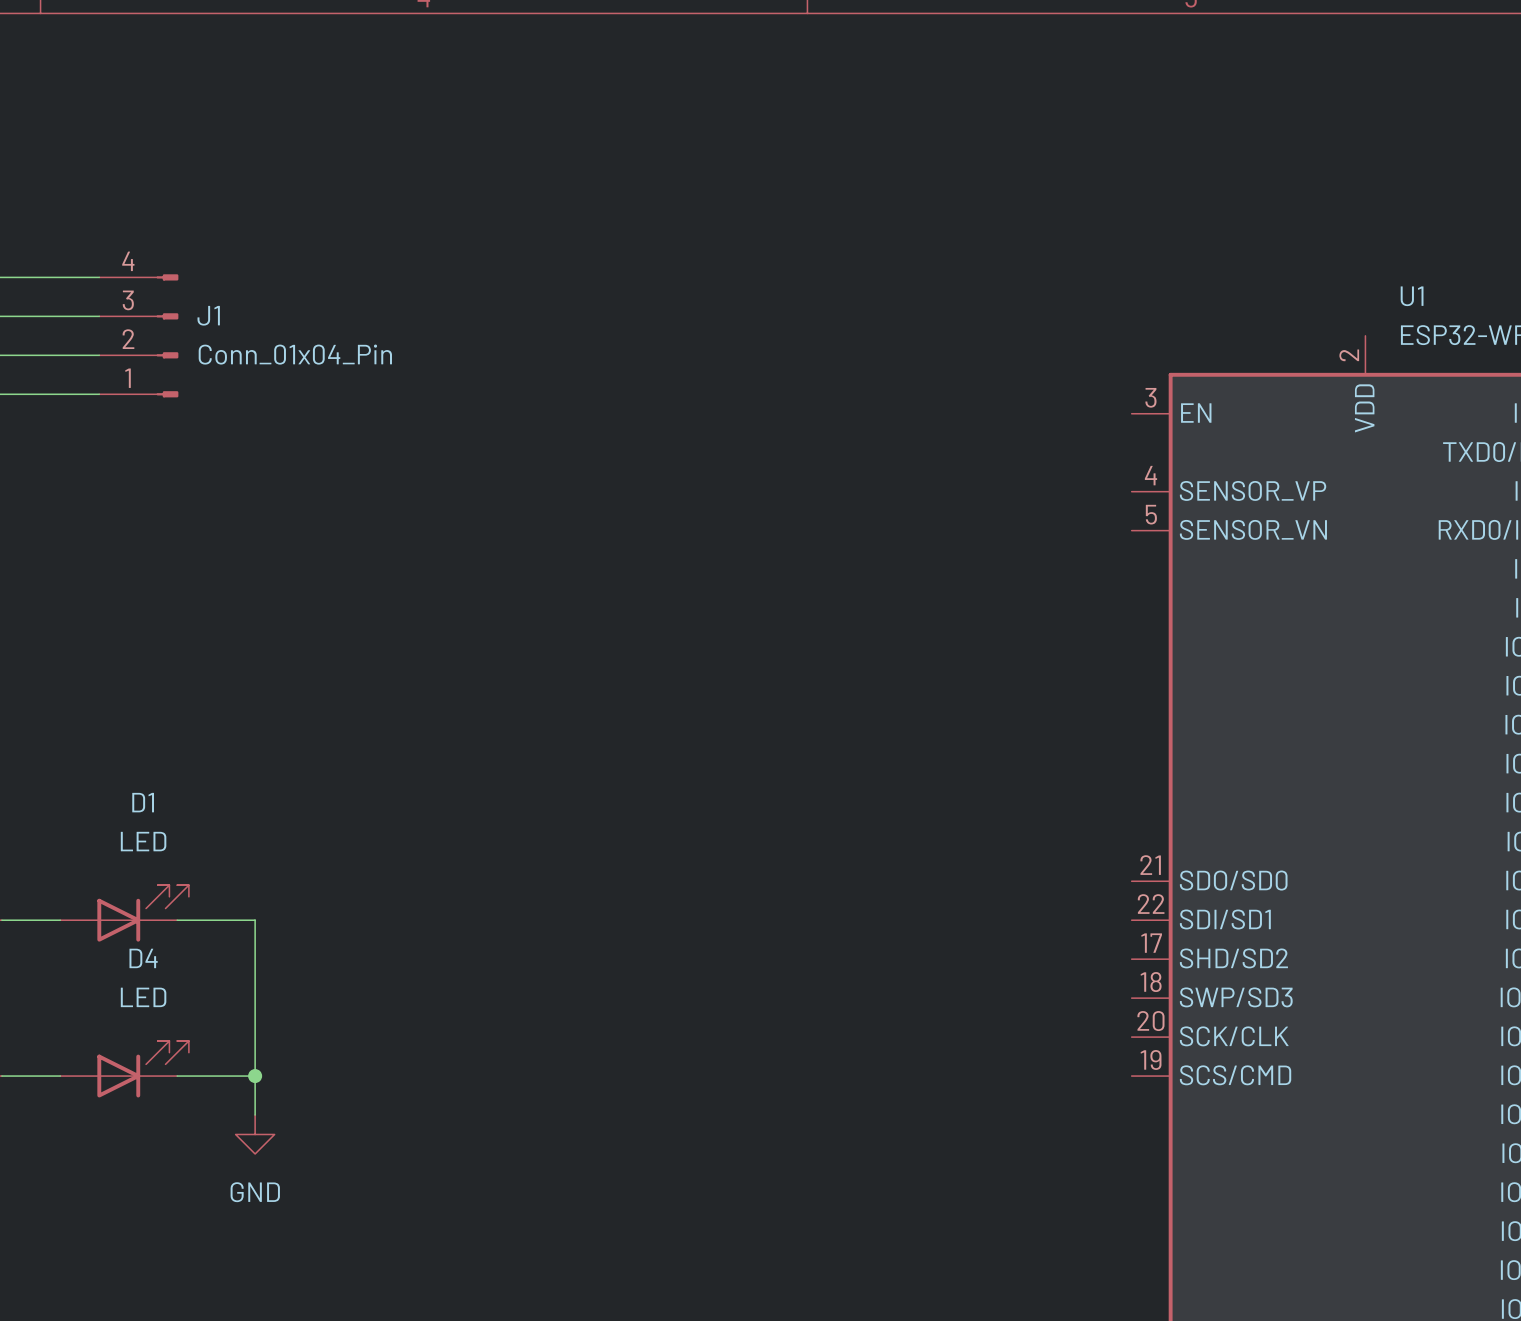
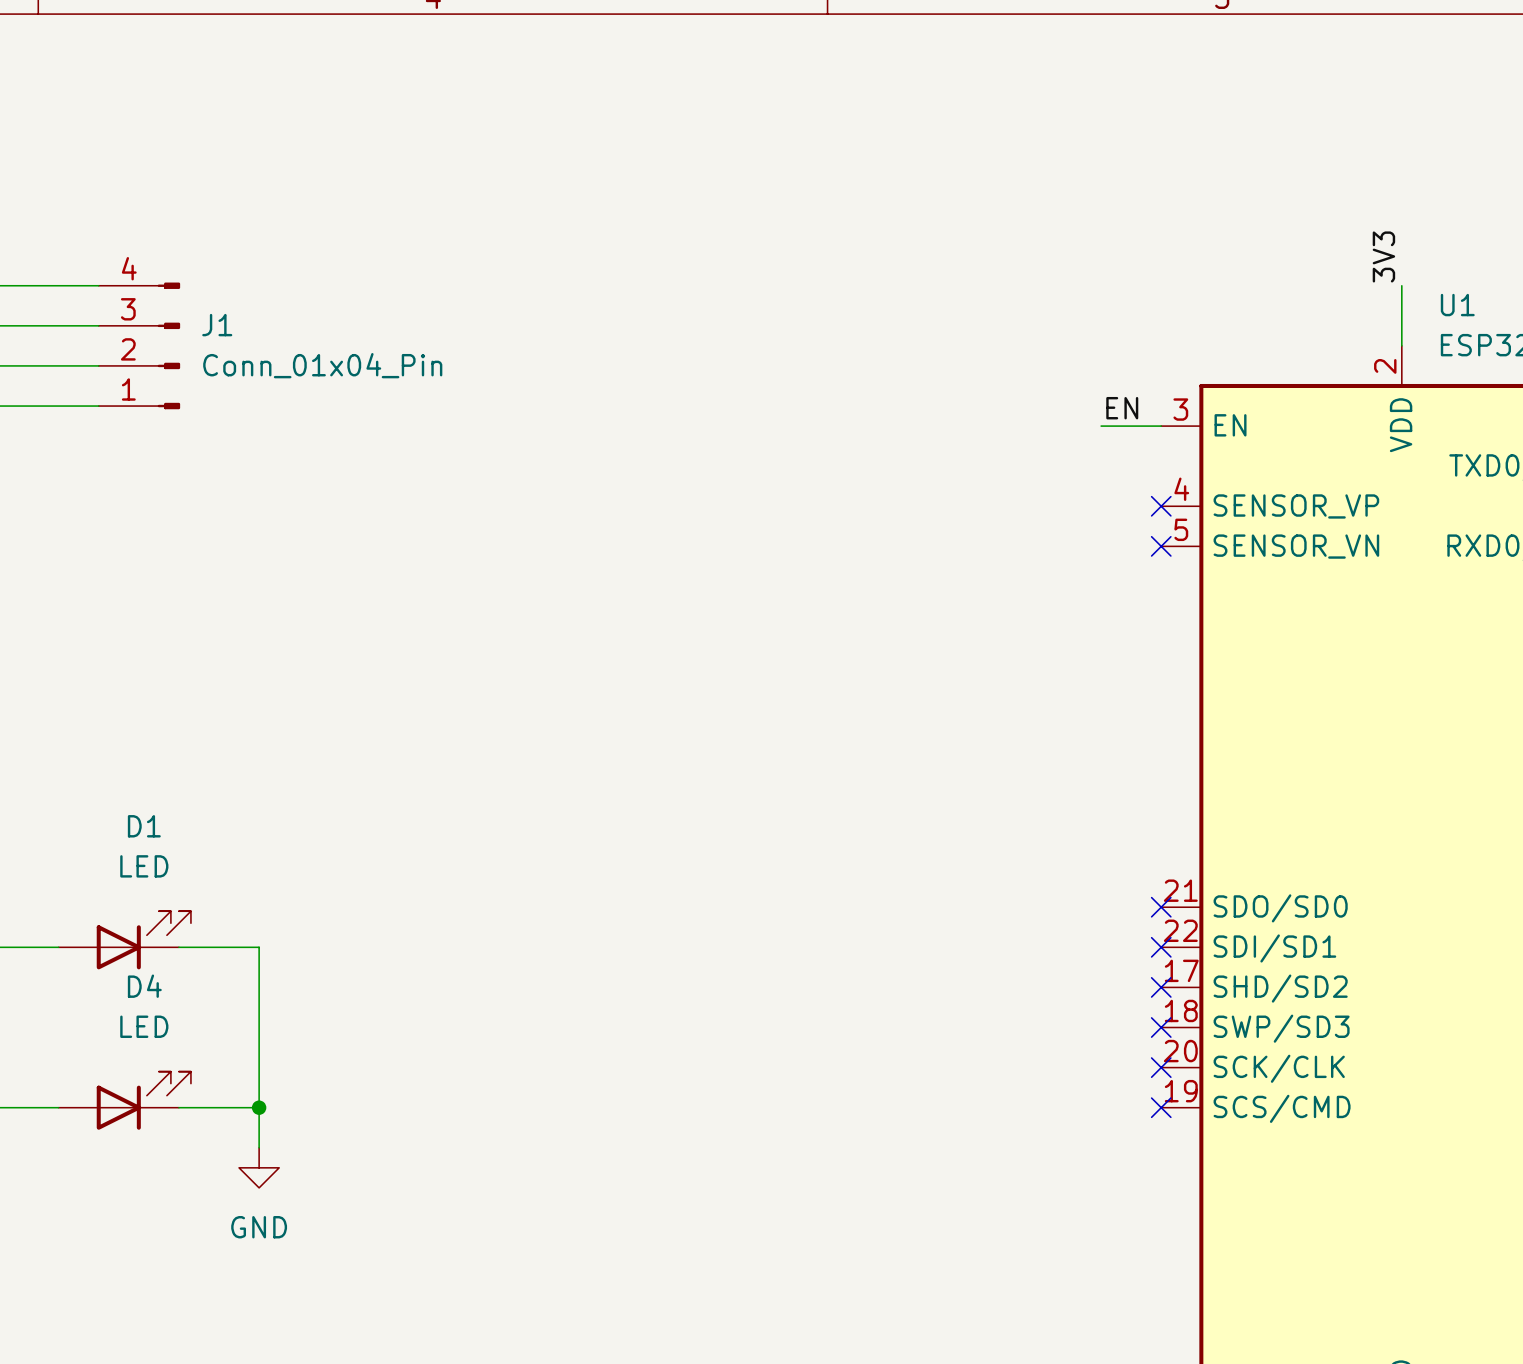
label: none -> 3V3 (1383, 256)
wire: none -> (1401, 285) (1401, 345)
label: none -> EN (1122, 408)
wire: none -> (1101, 426) (1161, 426)
no-connect mark: none -> (1161, 506)
no-connect mark: none -> (1161, 546)
no-connect mark: none -> (1161, 907)
no-connect mark: none -> (1161, 947)
no-connect mark: none -> (1161, 987)
no-connect mark: none -> (1161, 1027)
no-connect mark: none -> (1161, 1067)
no-connect mark: none -> (1161, 1107)

